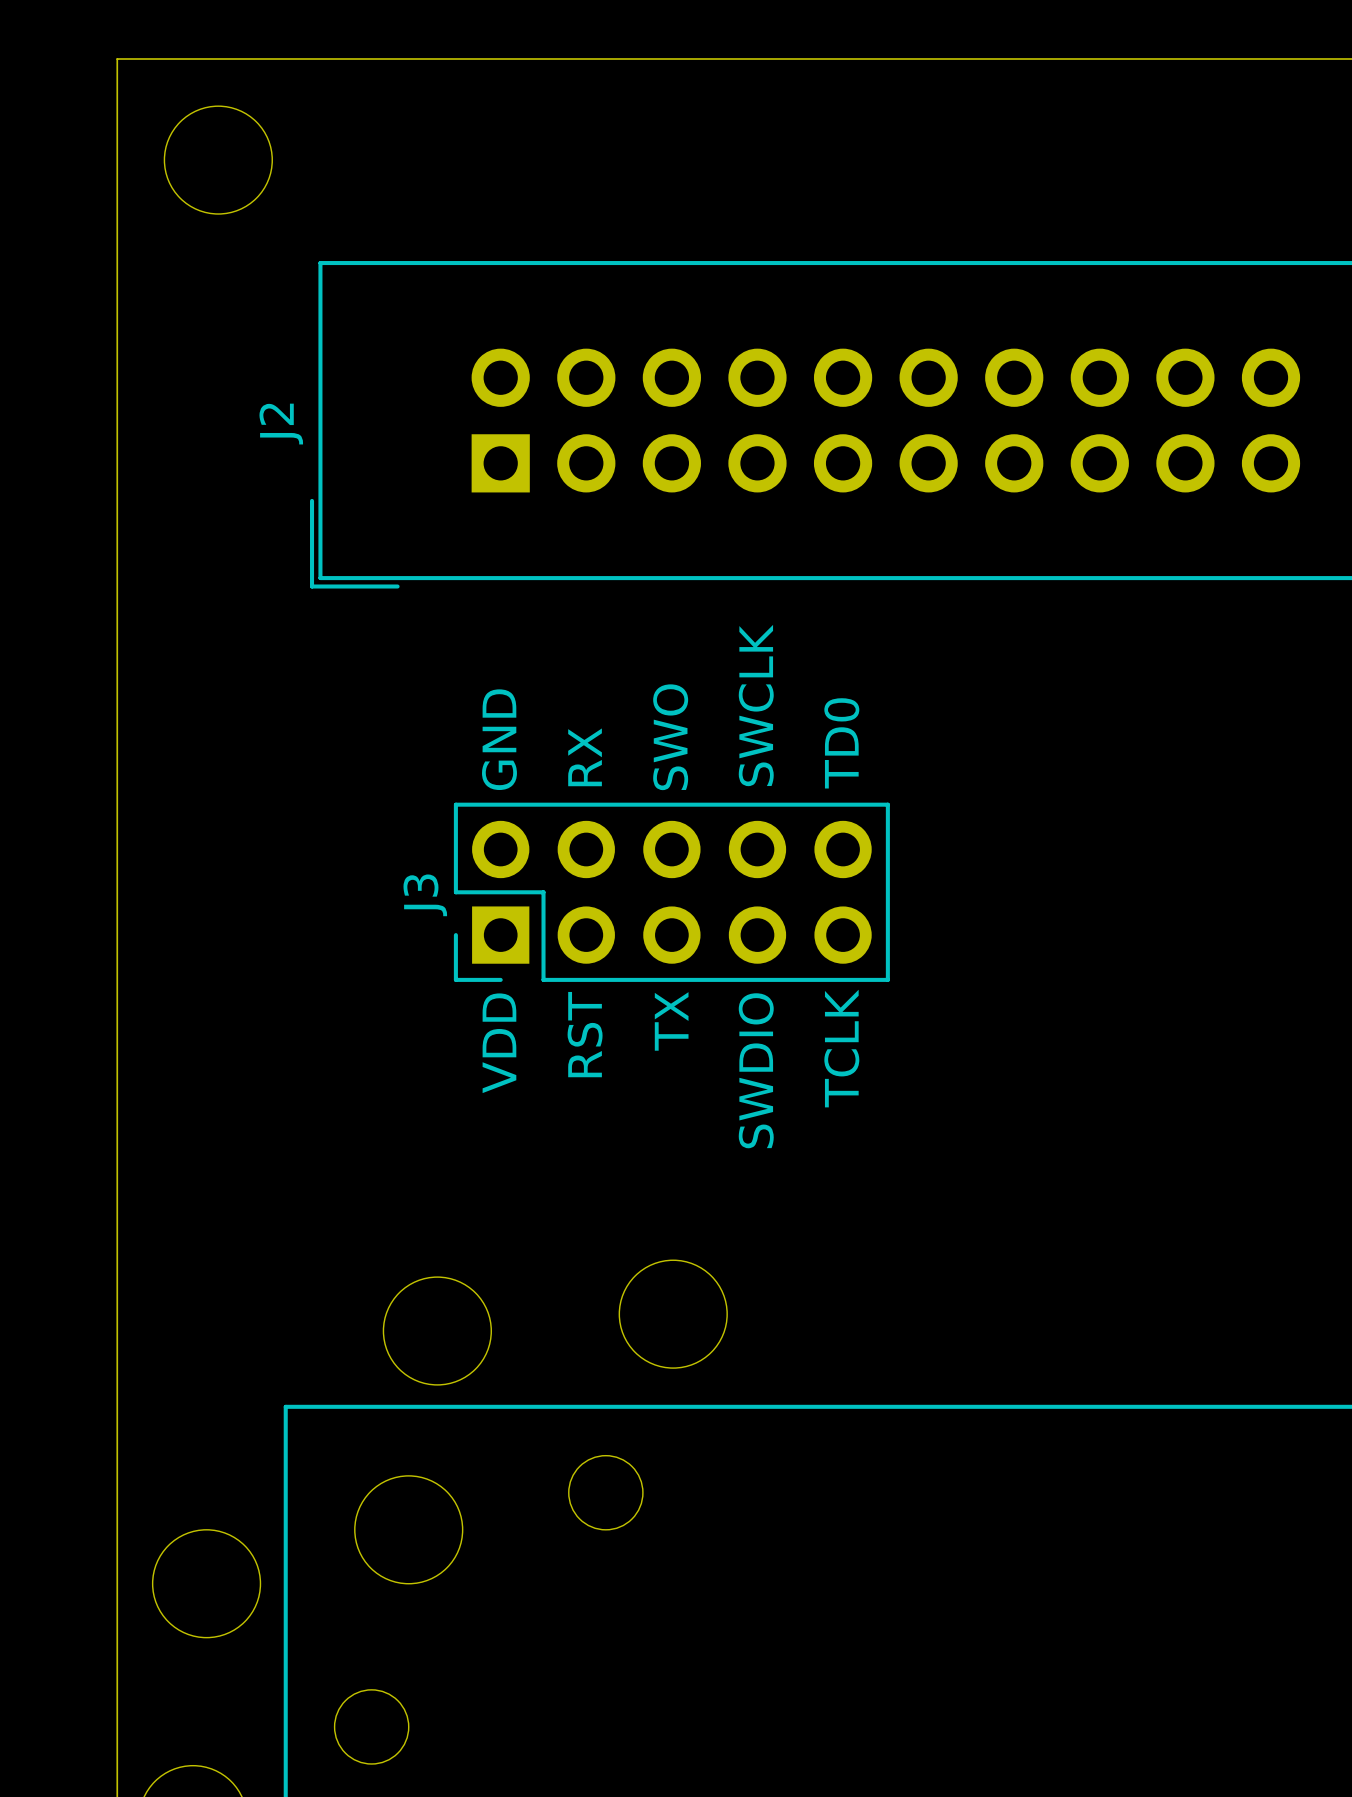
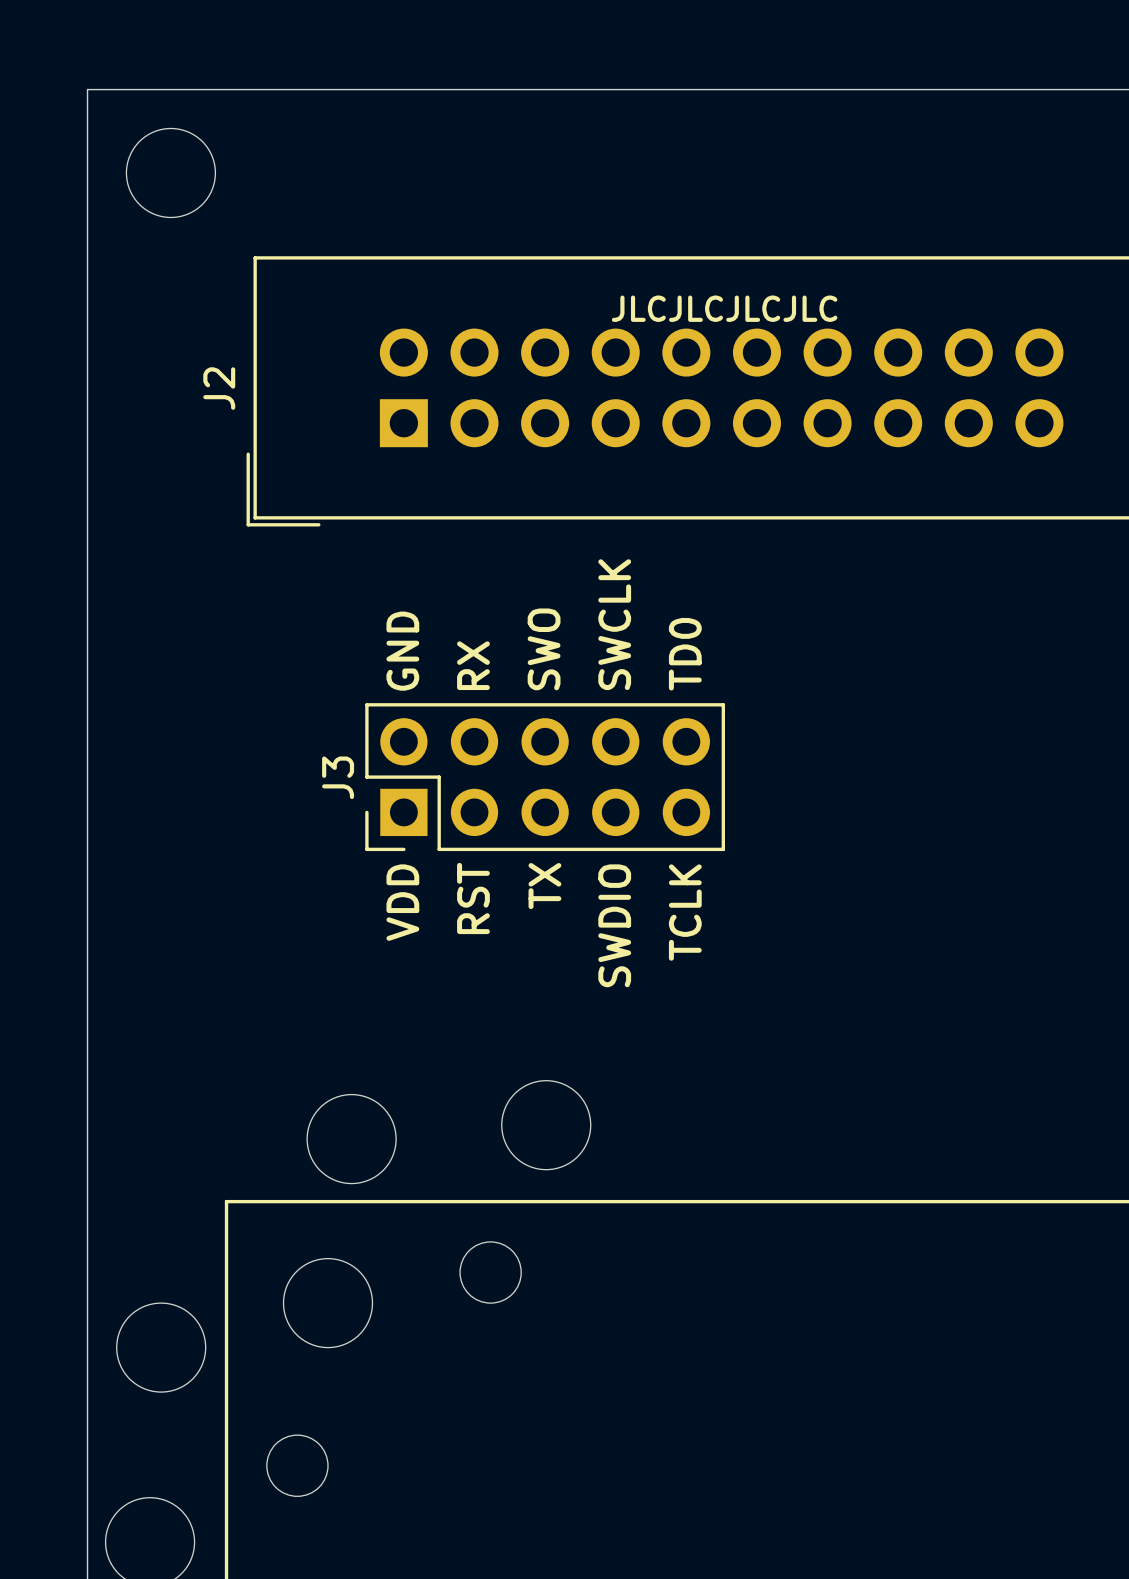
text: none -> JLCJLCJLCJLC (724, 308)

